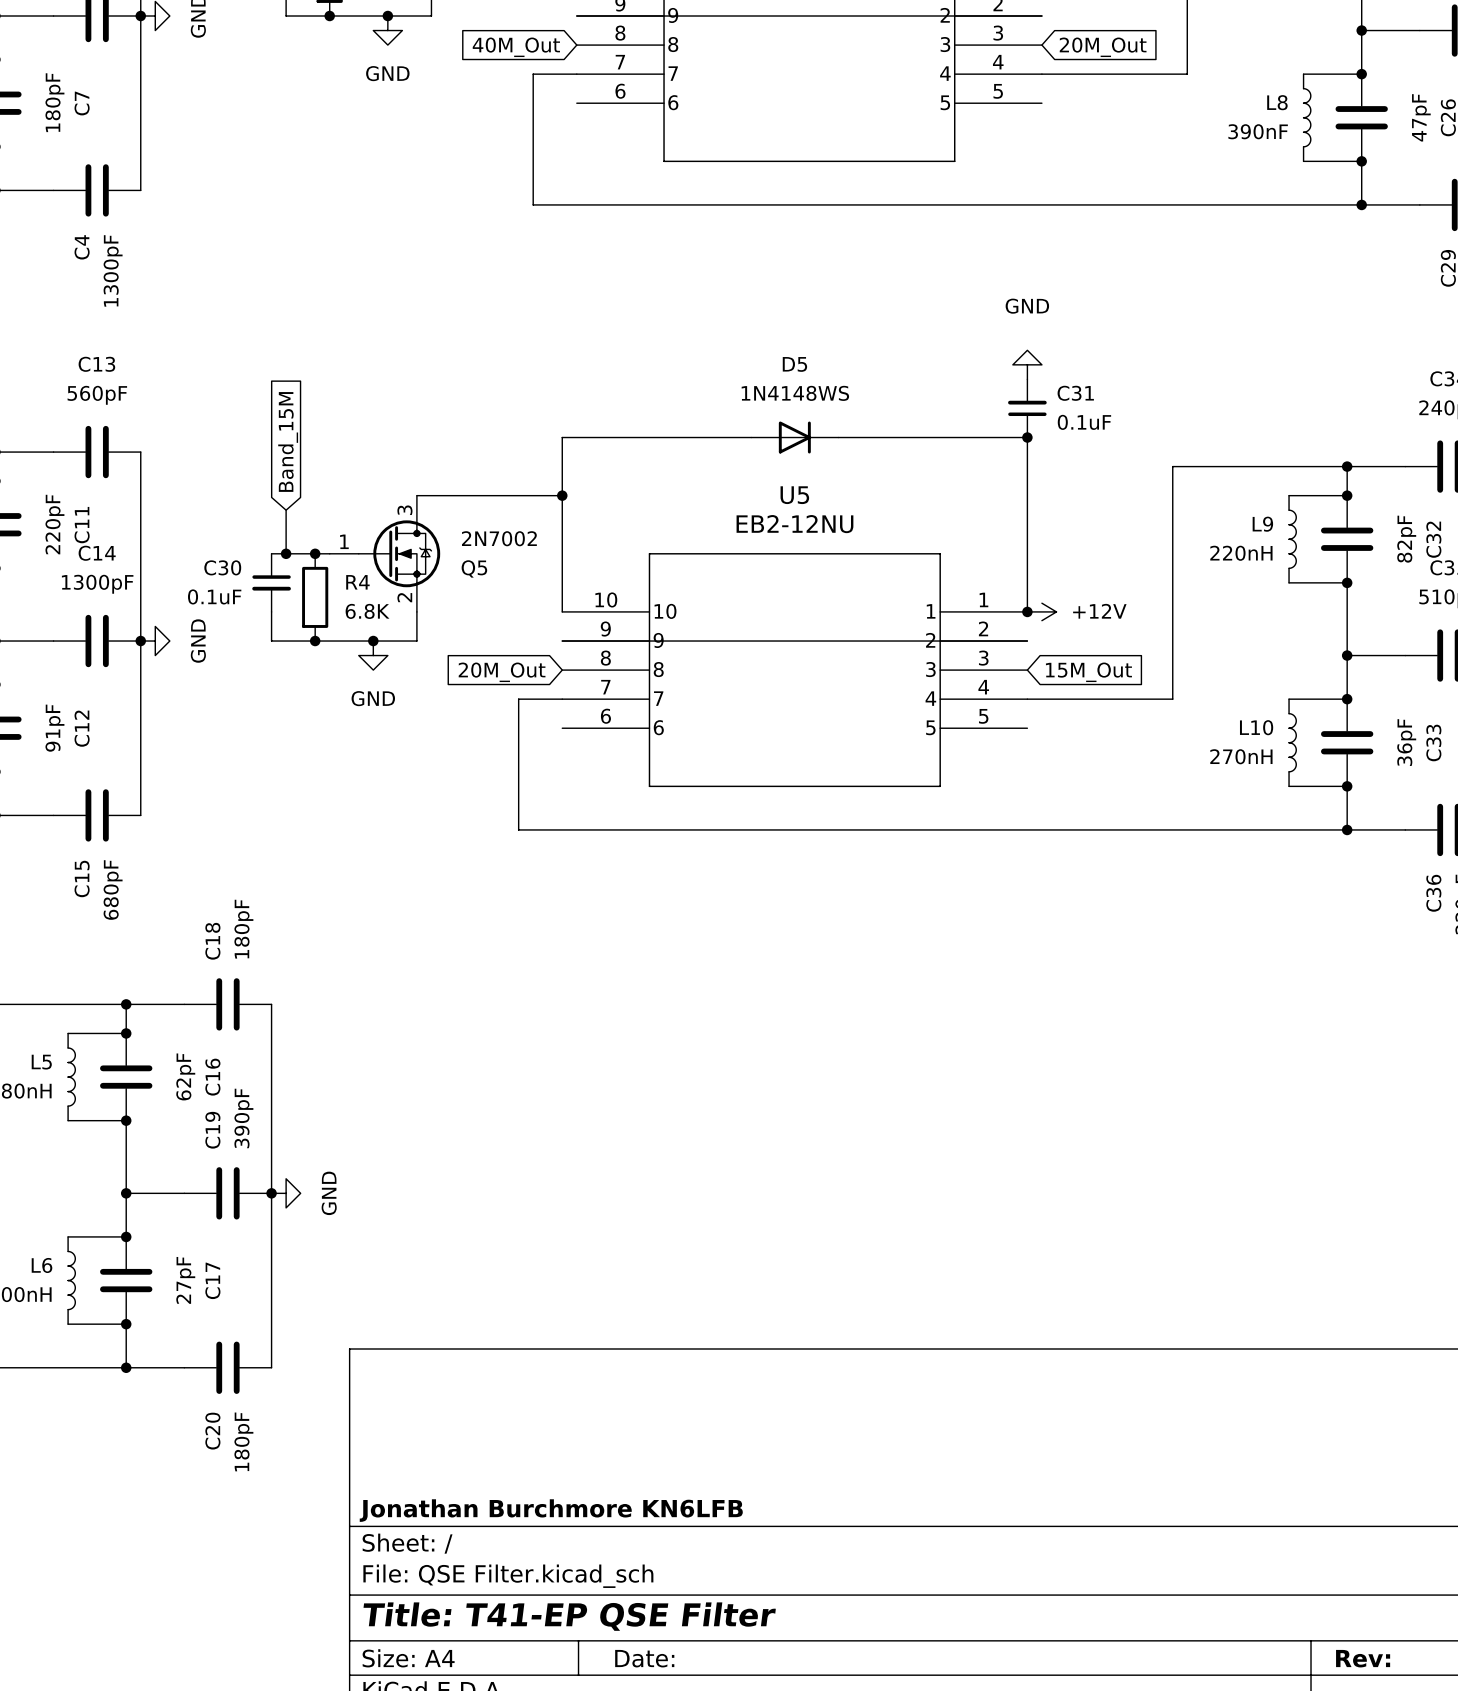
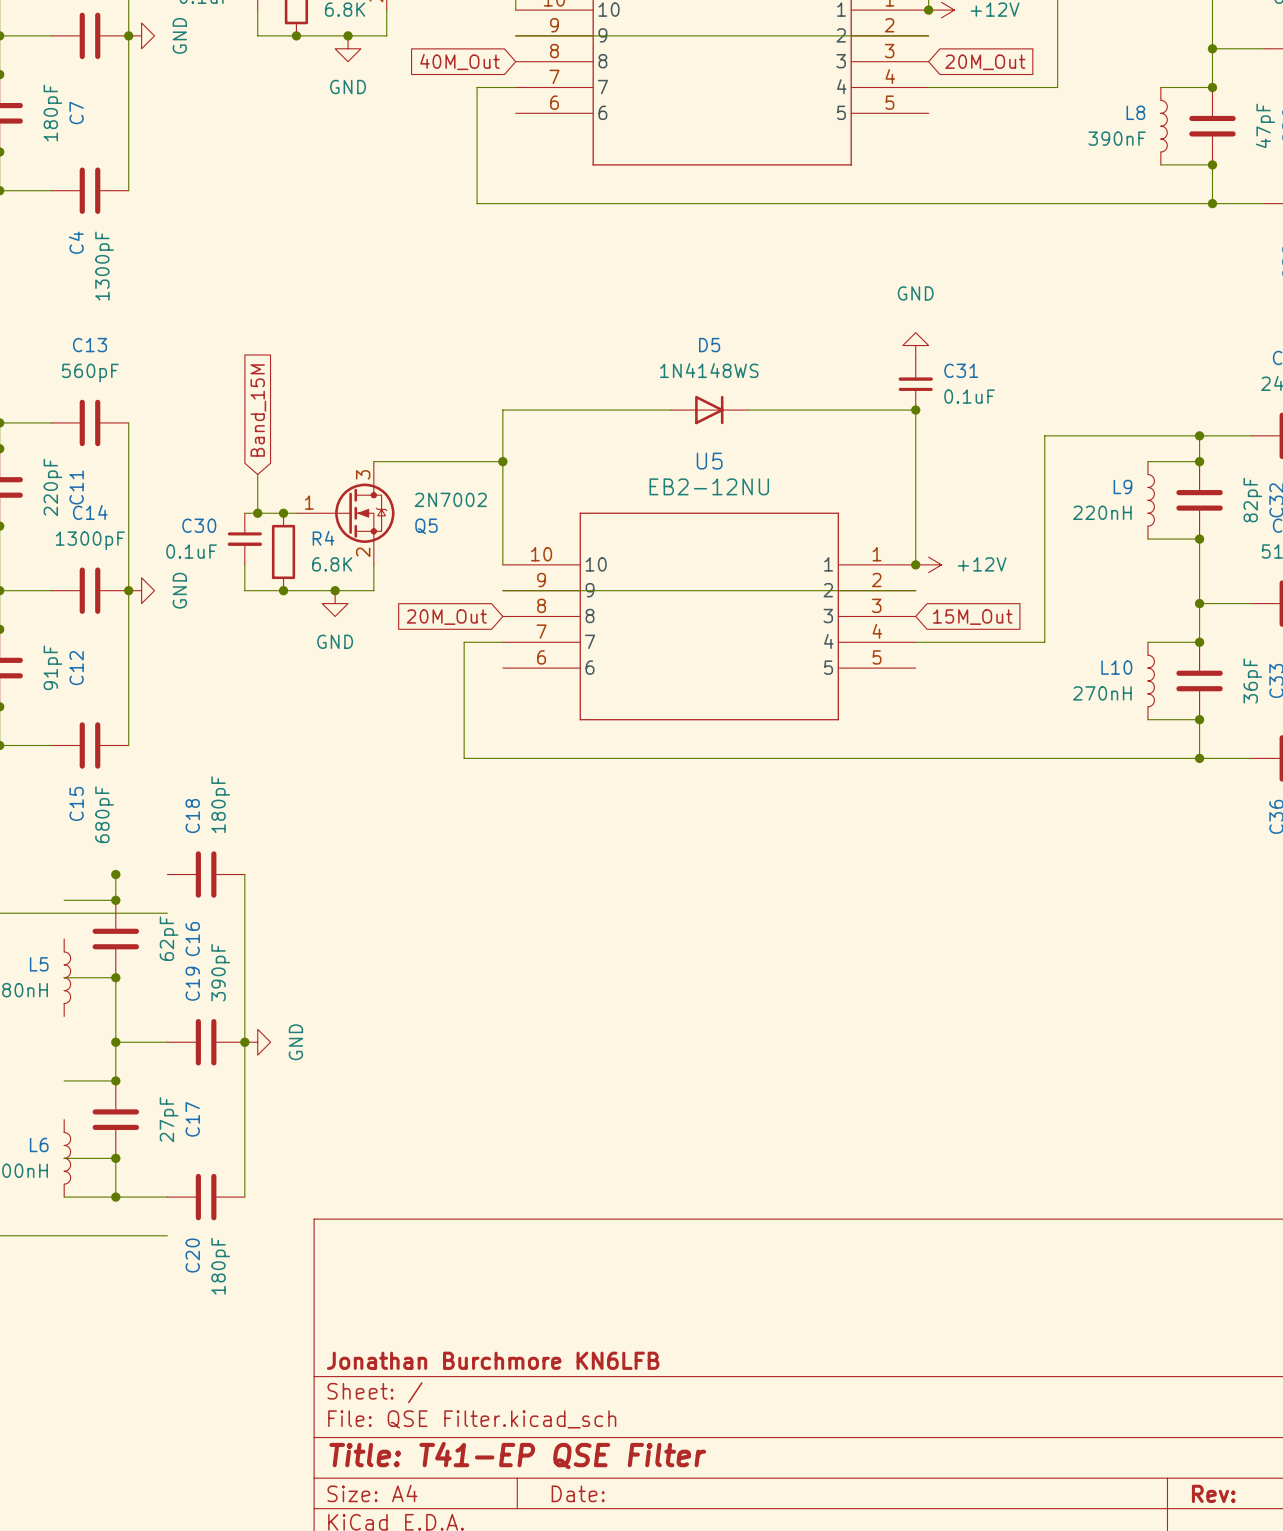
junction: none -> (115, 874)
wire: none -> (244, 874) (244, 913)
wire: (126, 1004) (126, 1033) (68, 1033) -> (115, 874) (115, 900) (64, 900)
junction position: (126, 1004) -> (115, 900)
C18 position: (227, 1004) -> (206, 874)
junction: (126, 1033) -> none
junction: none -> (115, 977)
C16 position: (126, 1077) -> (115, 939)
wire: (68, 1120) (126, 1120) -> (64, 977) (115, 977) (115, 1016)
junction: (126, 1120) -> none
wire: none -> (115, 1042) (167, 1042)
junction: none -> (115, 1042)
wire: none -> (64, 1080) (115, 1080)
wire: (184, 1193) (126, 1193) (126, 1236) (68, 1236) -> none
C19 position: (227, 1193) -> (206, 1042)
junction position: (271, 1193) -> (244, 1042)
power symbol position: GND (286, 1193) -> GND (257, 1042)
junction: (126, 1236) -> none
wire: none -> (64, 1158) (115, 1158) (115, 1197) (167, 1197)
junction: none -> (115, 1158)
C17 position: (126, 1280) -> (115, 1119)
wire: (126, 1324) (126, 1367) -> none
wire: (271, 1324) (271, 1367) -> none
junction: (126, 1367) -> none
C20 position: (227, 1367) -> (206, 1197)

